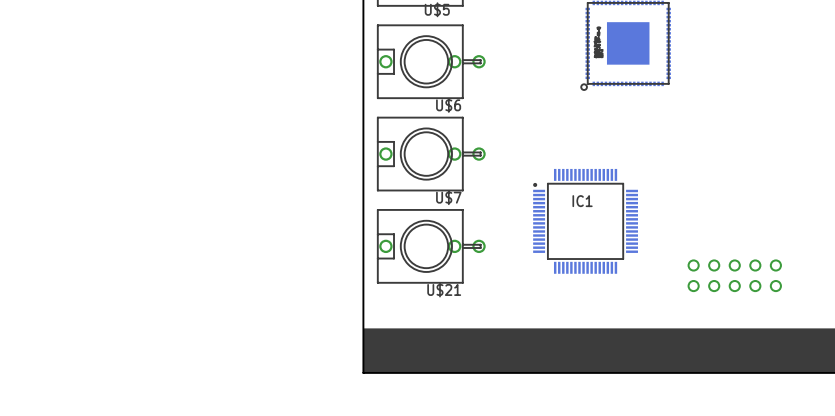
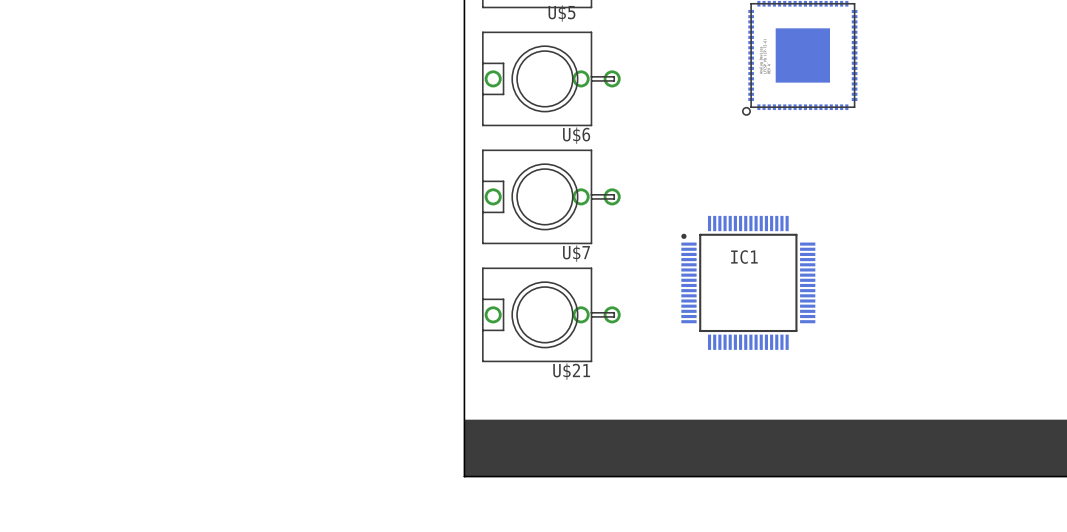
part: (734, 275) -> none

